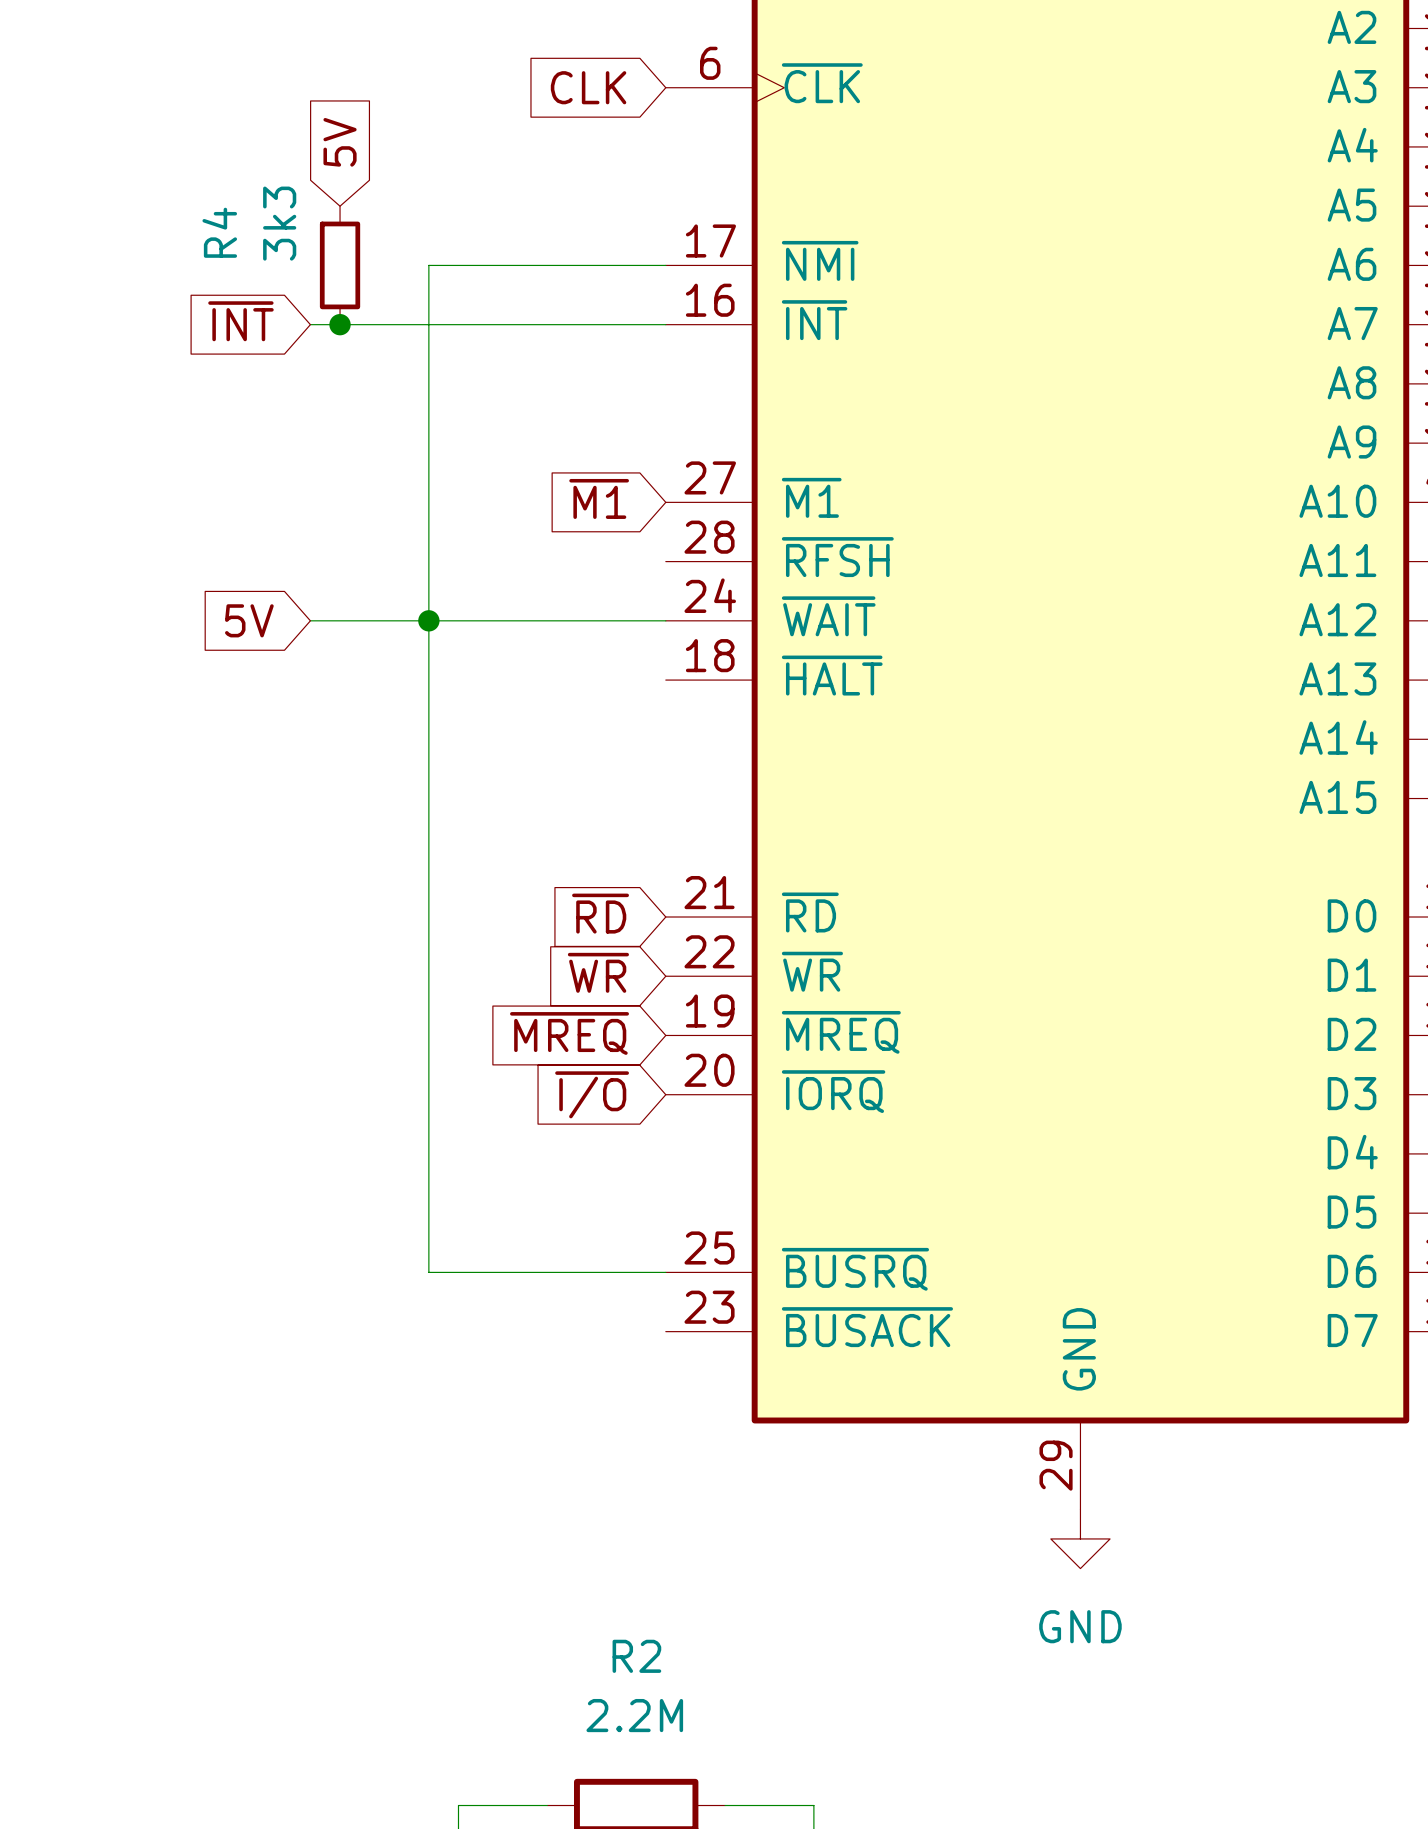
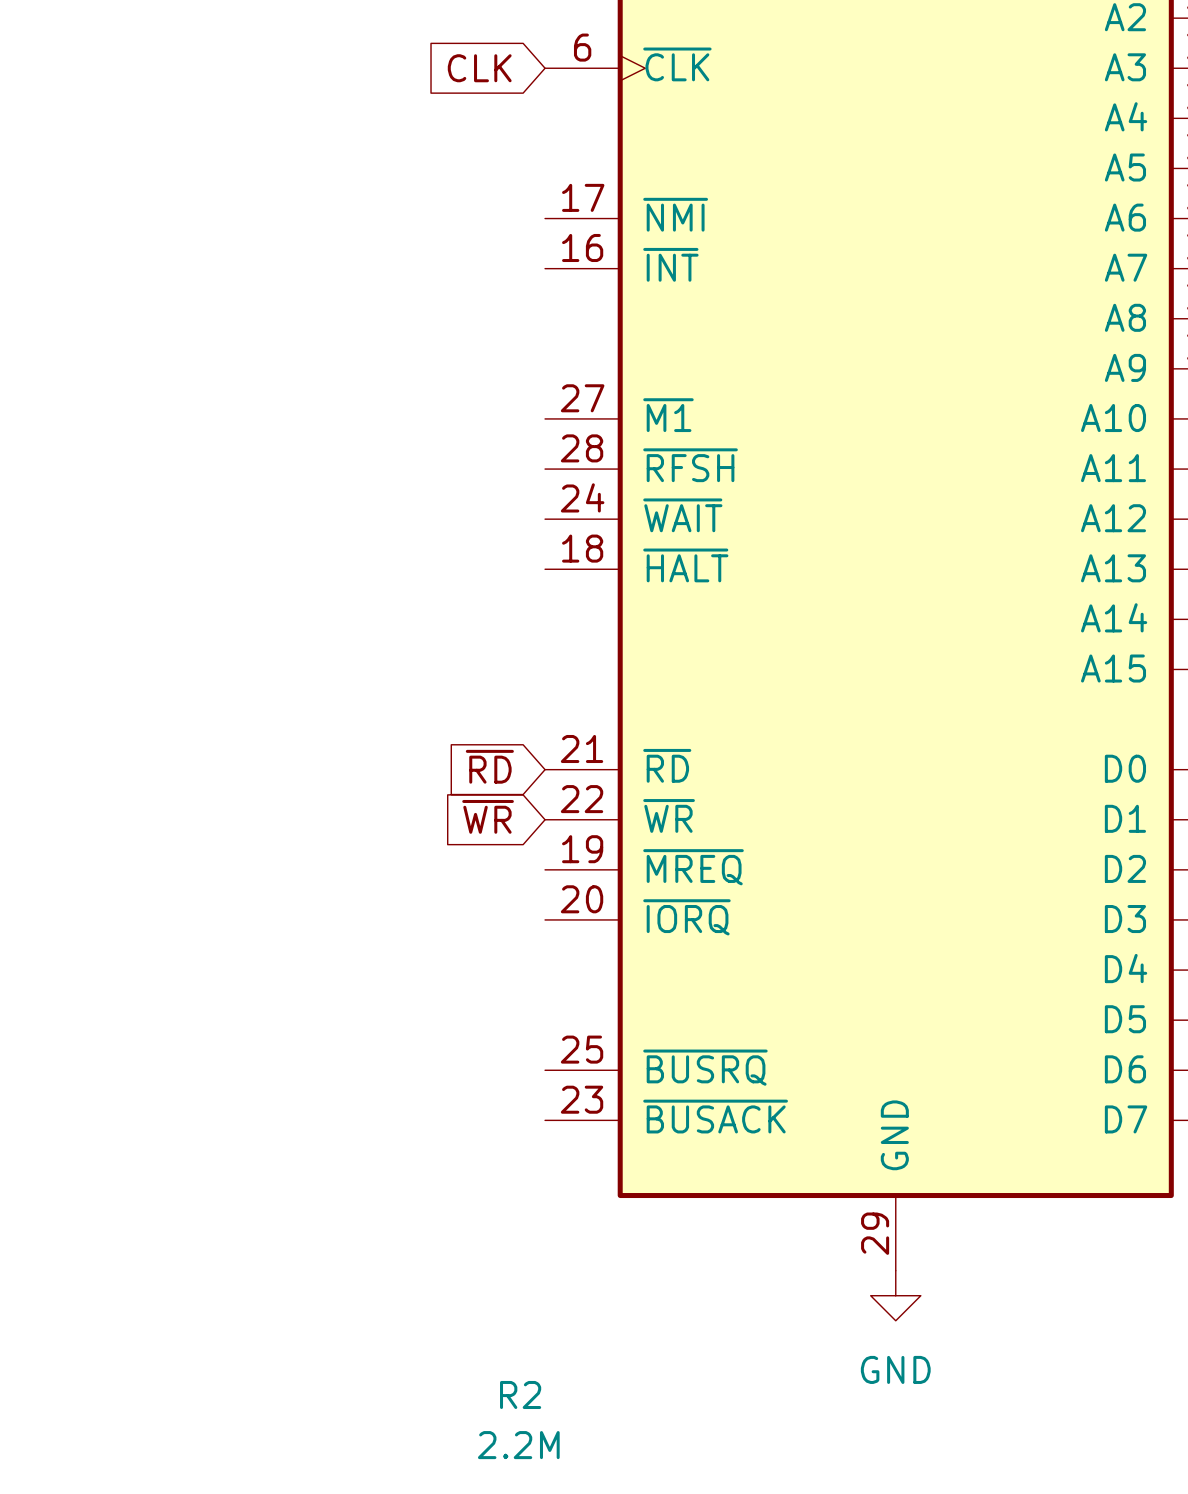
global label: 5V (340, 142) -> none
R4: 3k3 (340, 265) -> none
wire: (665, 265) (428, 265) (428, 1272) (665, 1272) -> none
global label: ~{INT} (240, 321) -> none
wire: (310, 324) (665, 324) -> none
junction: (340, 324) -> none
global label: ~{M1} (599, 498) -> none
global label: 5V (249, 620) -> none
wire: (310, 620) (665, 620) -> none
junction: (428, 620) -> none
global label: ~{MREQ} (569, 1033) -> none
global label: ~{I/O} (592, 1094) -> none

